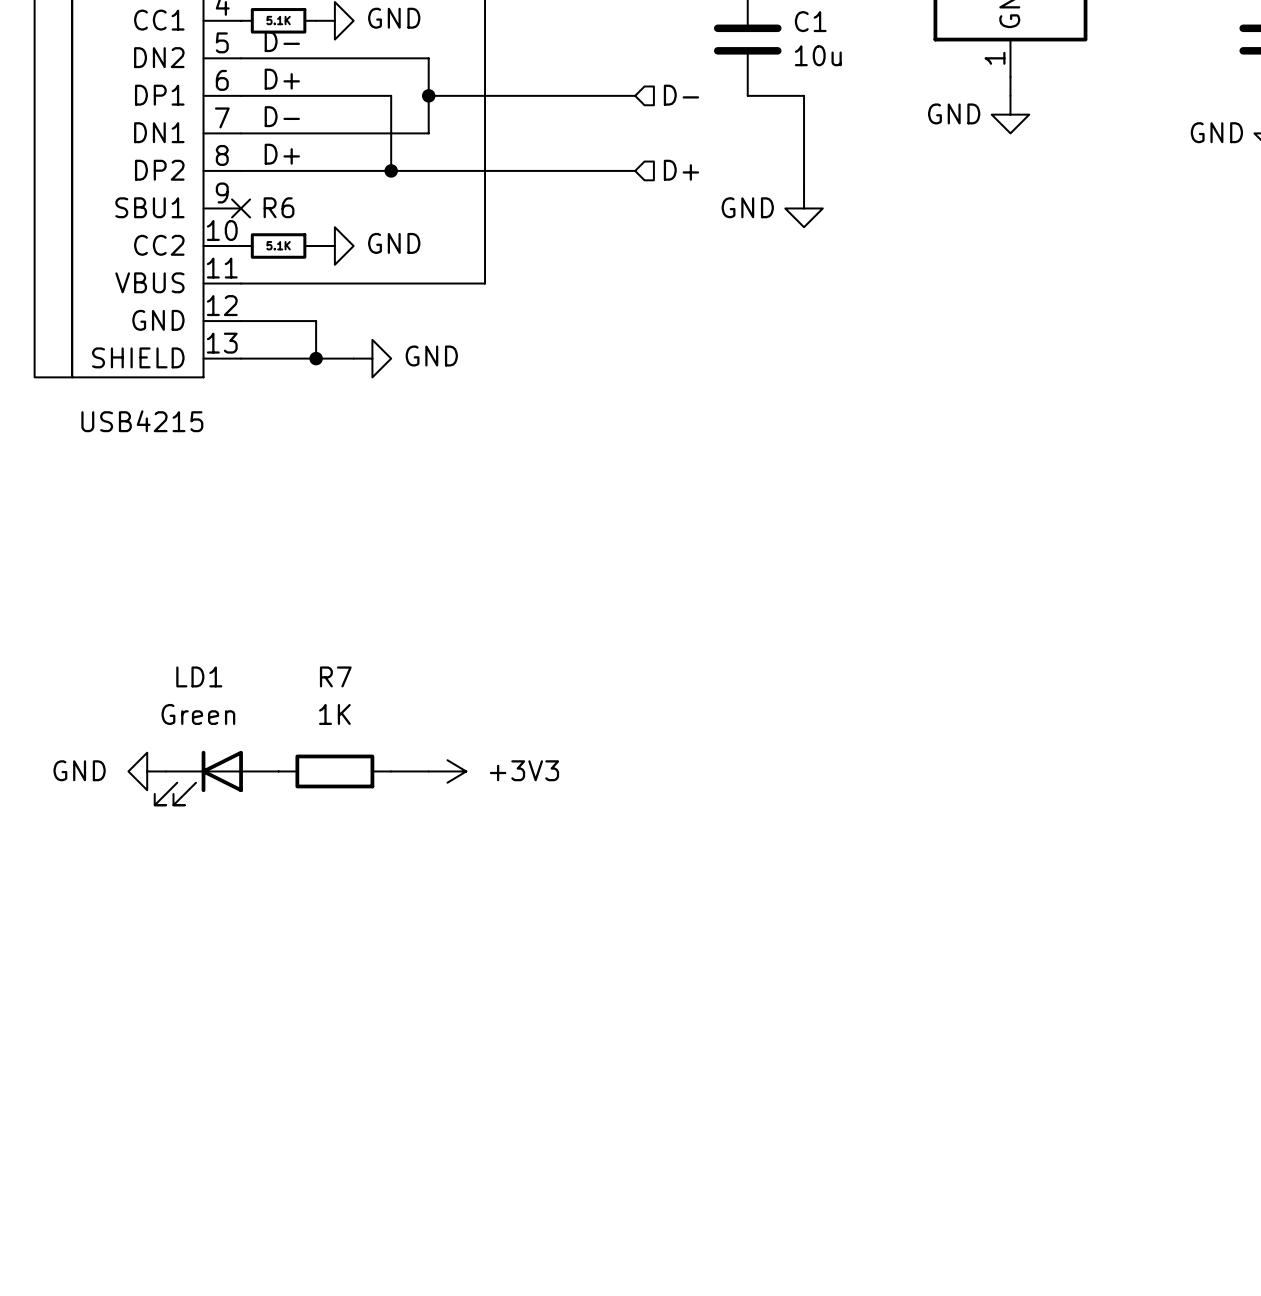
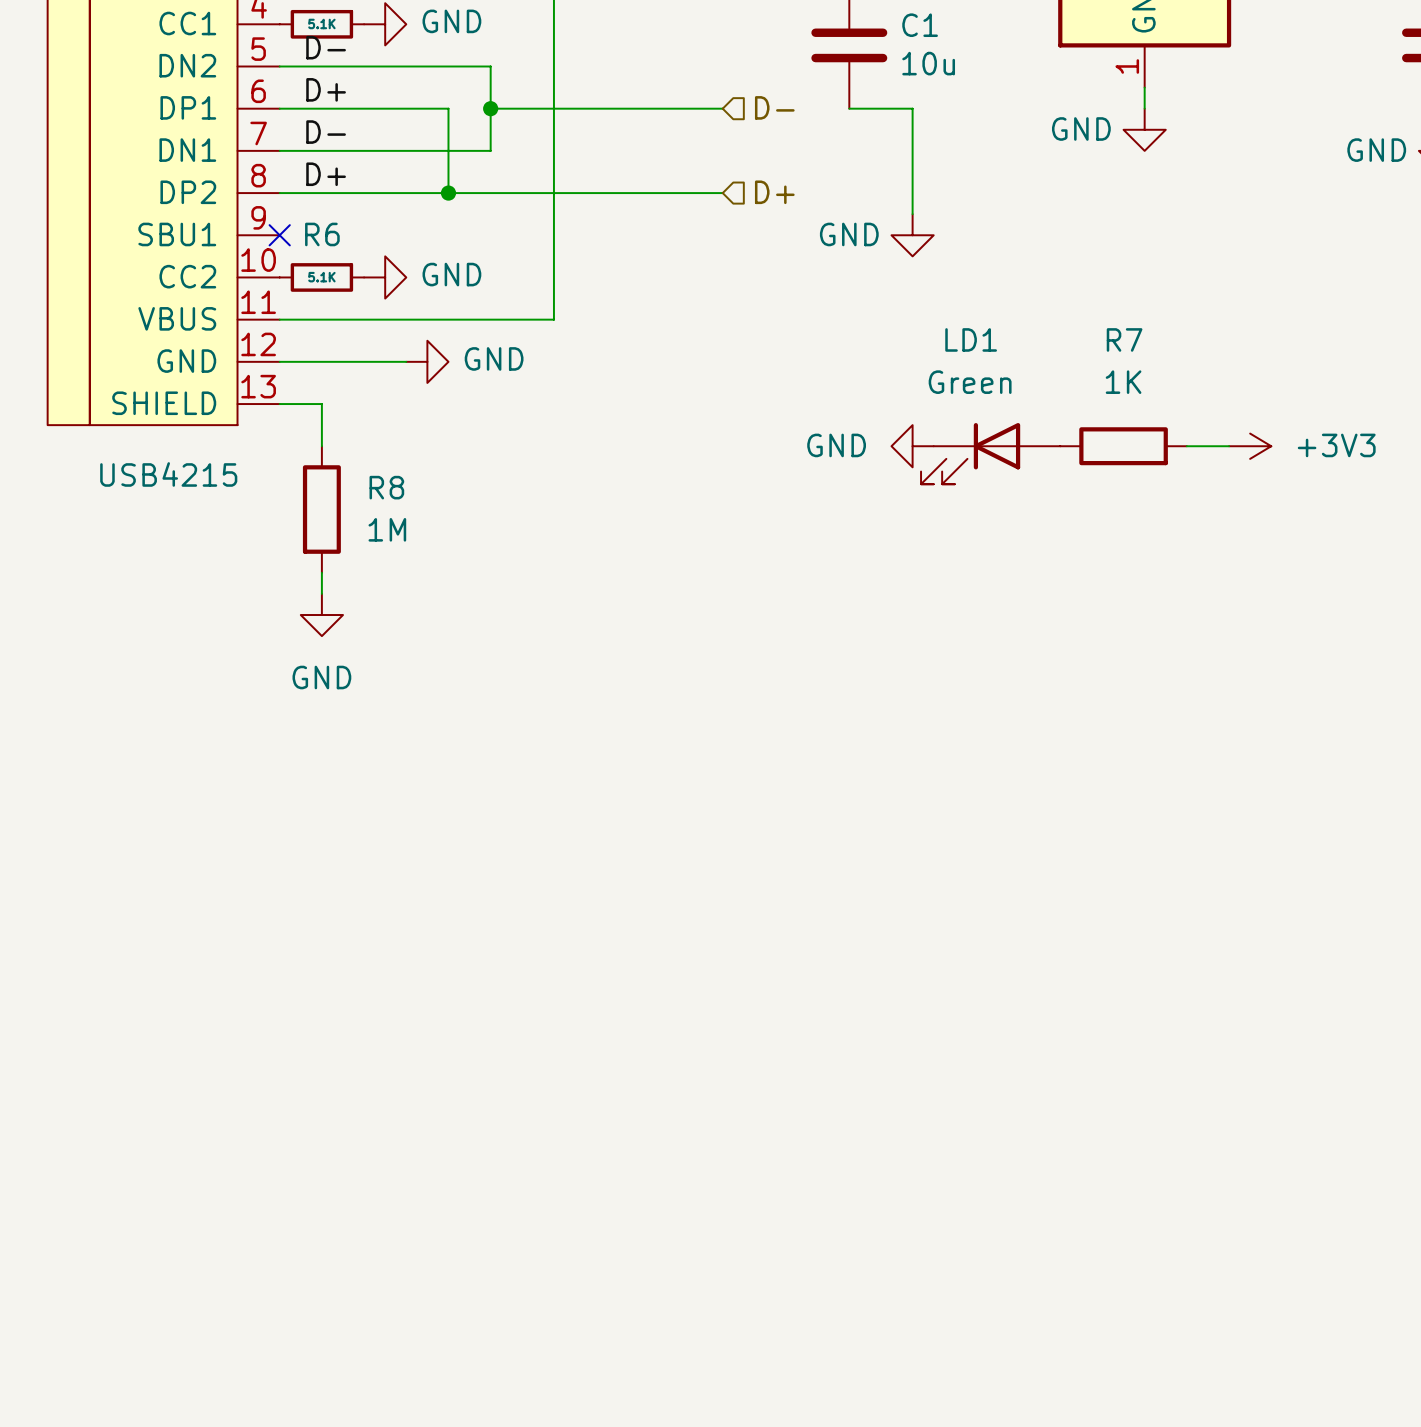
wire: (316, 321) (316, 358) -> (364, 361) (406, 361)
wire: (278, 358) (353, 358) -> (321, 404) (321, 446)
junction: (316, 358) -> none
power symbol position: GND (372, 358) -> GND (427, 361)
power symbol: none -> GND (912, 446)
wire: none -> (1186, 446) (1229, 446)
power symbol: none -> +3V3 (1250, 446)
R8: none -> 1M (321, 509)
wire: none -> (321, 572) (321, 593)
power symbol: none -> GND (321, 615)
power symbol: GND (147, 771) -> none
R7 position: (334, 771) -> (1123, 446)
wire: (391, 771) (428, 771) -> none
power symbol: +3V3 (447, 771) -> none
LD1 position: (216, 778) -> (990, 453)

